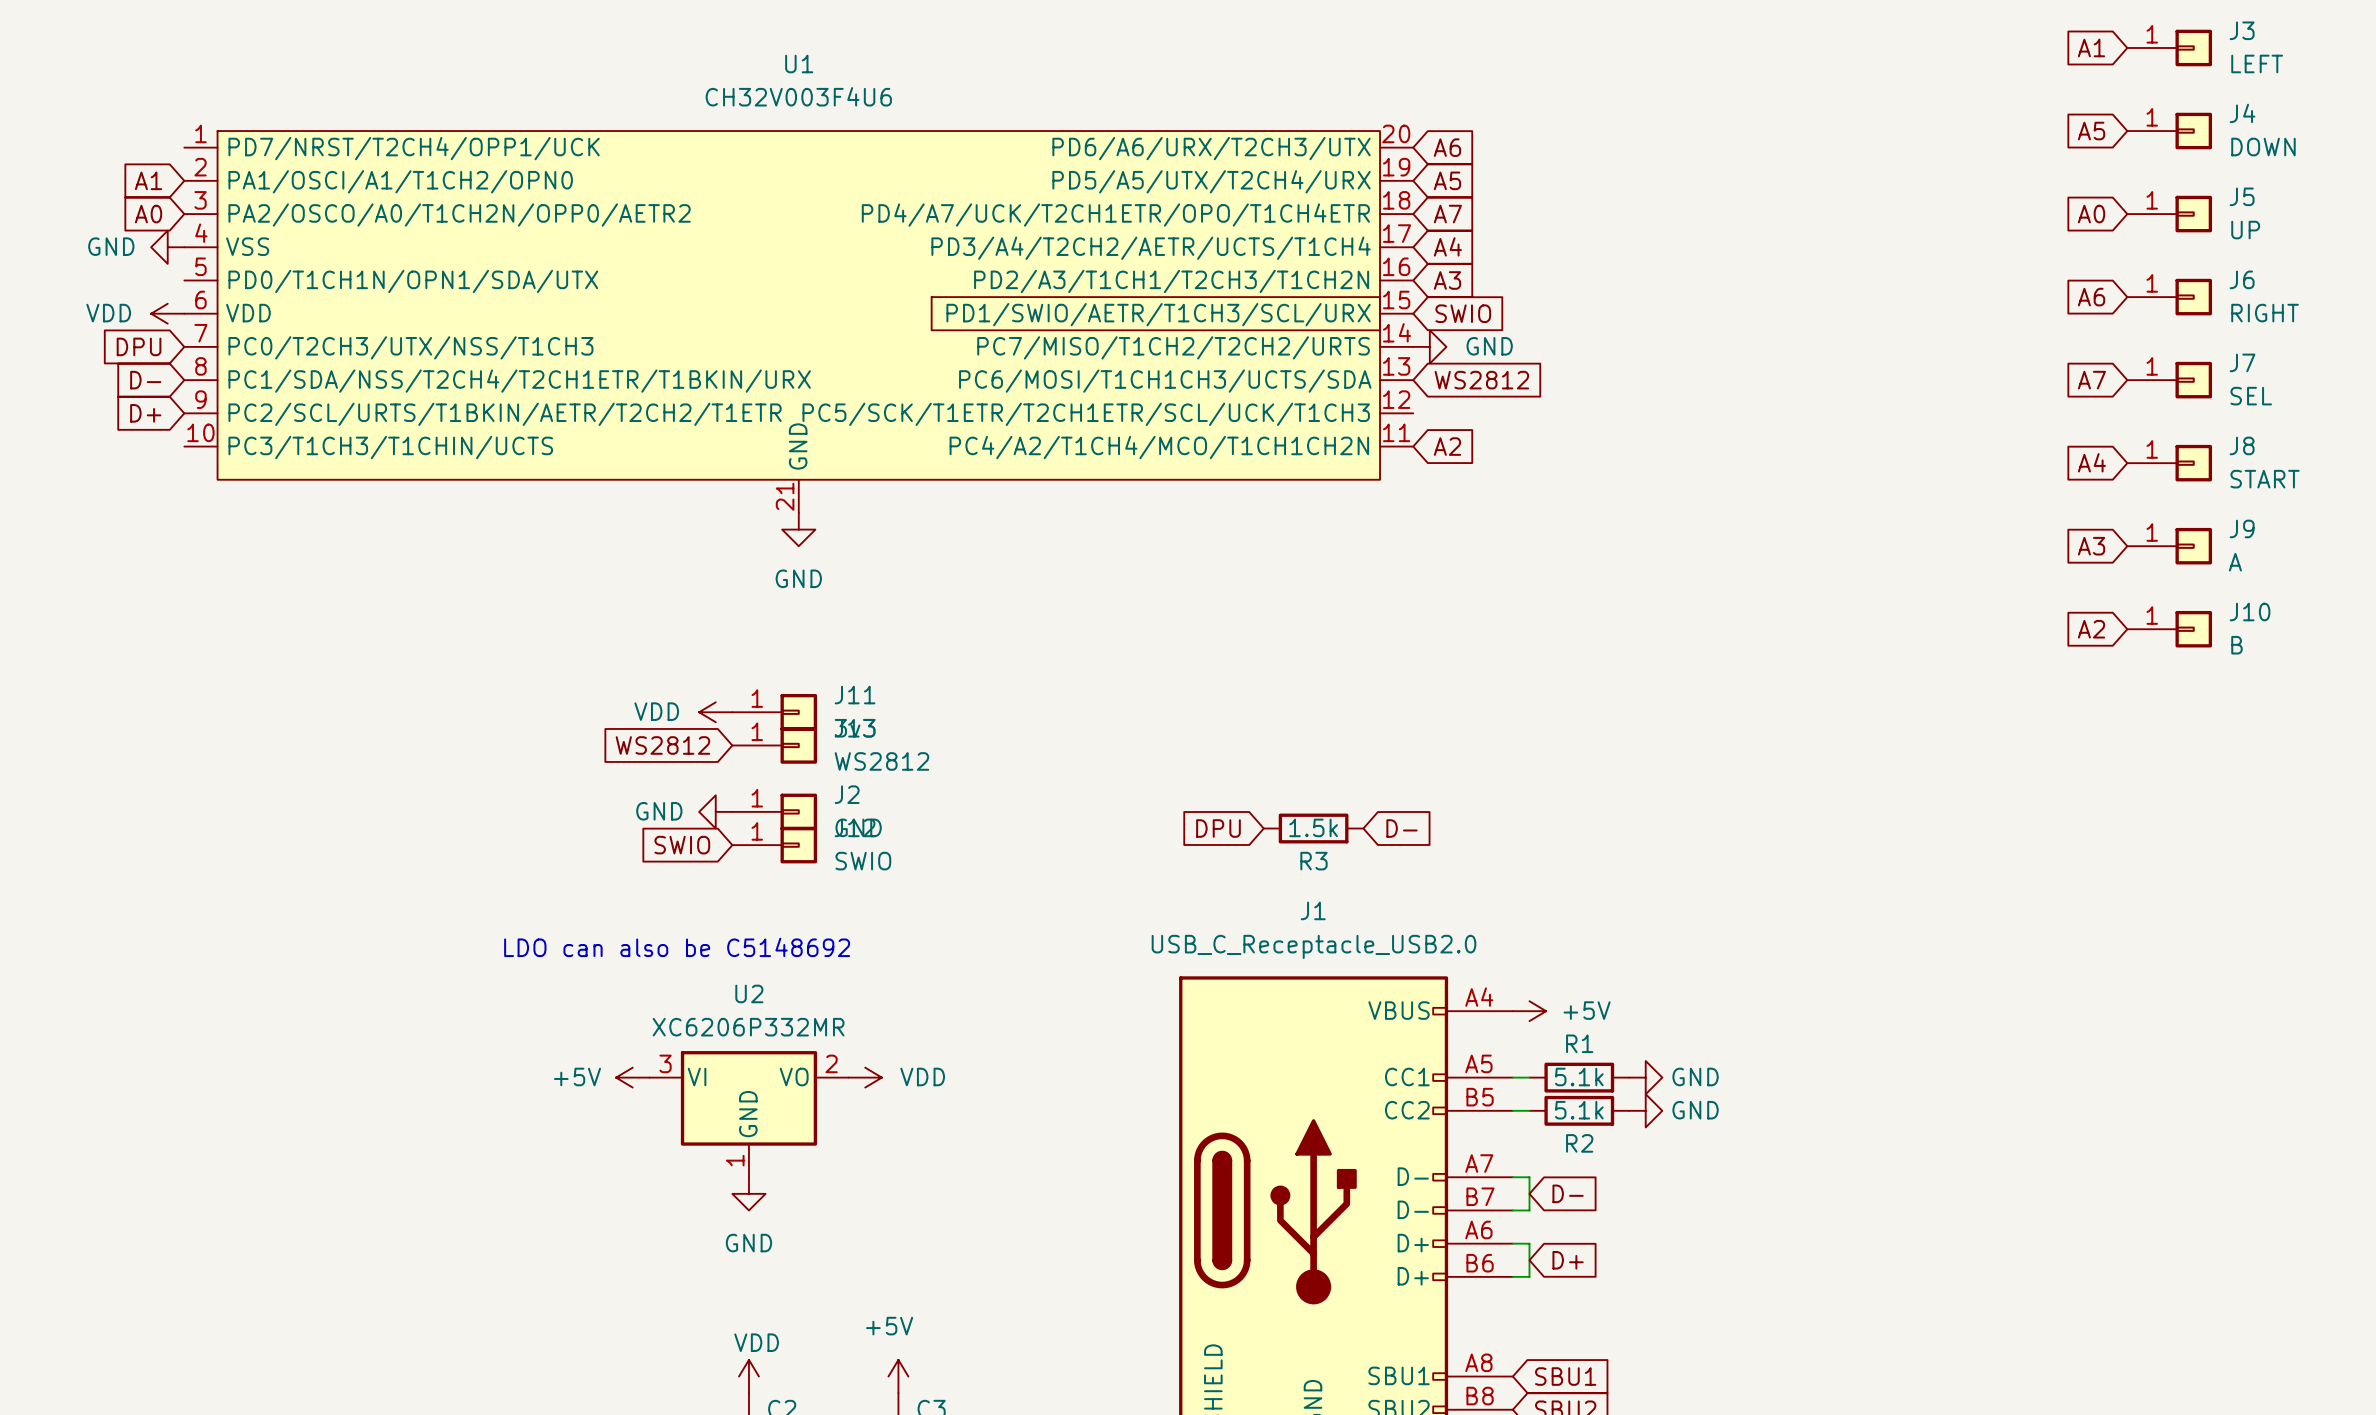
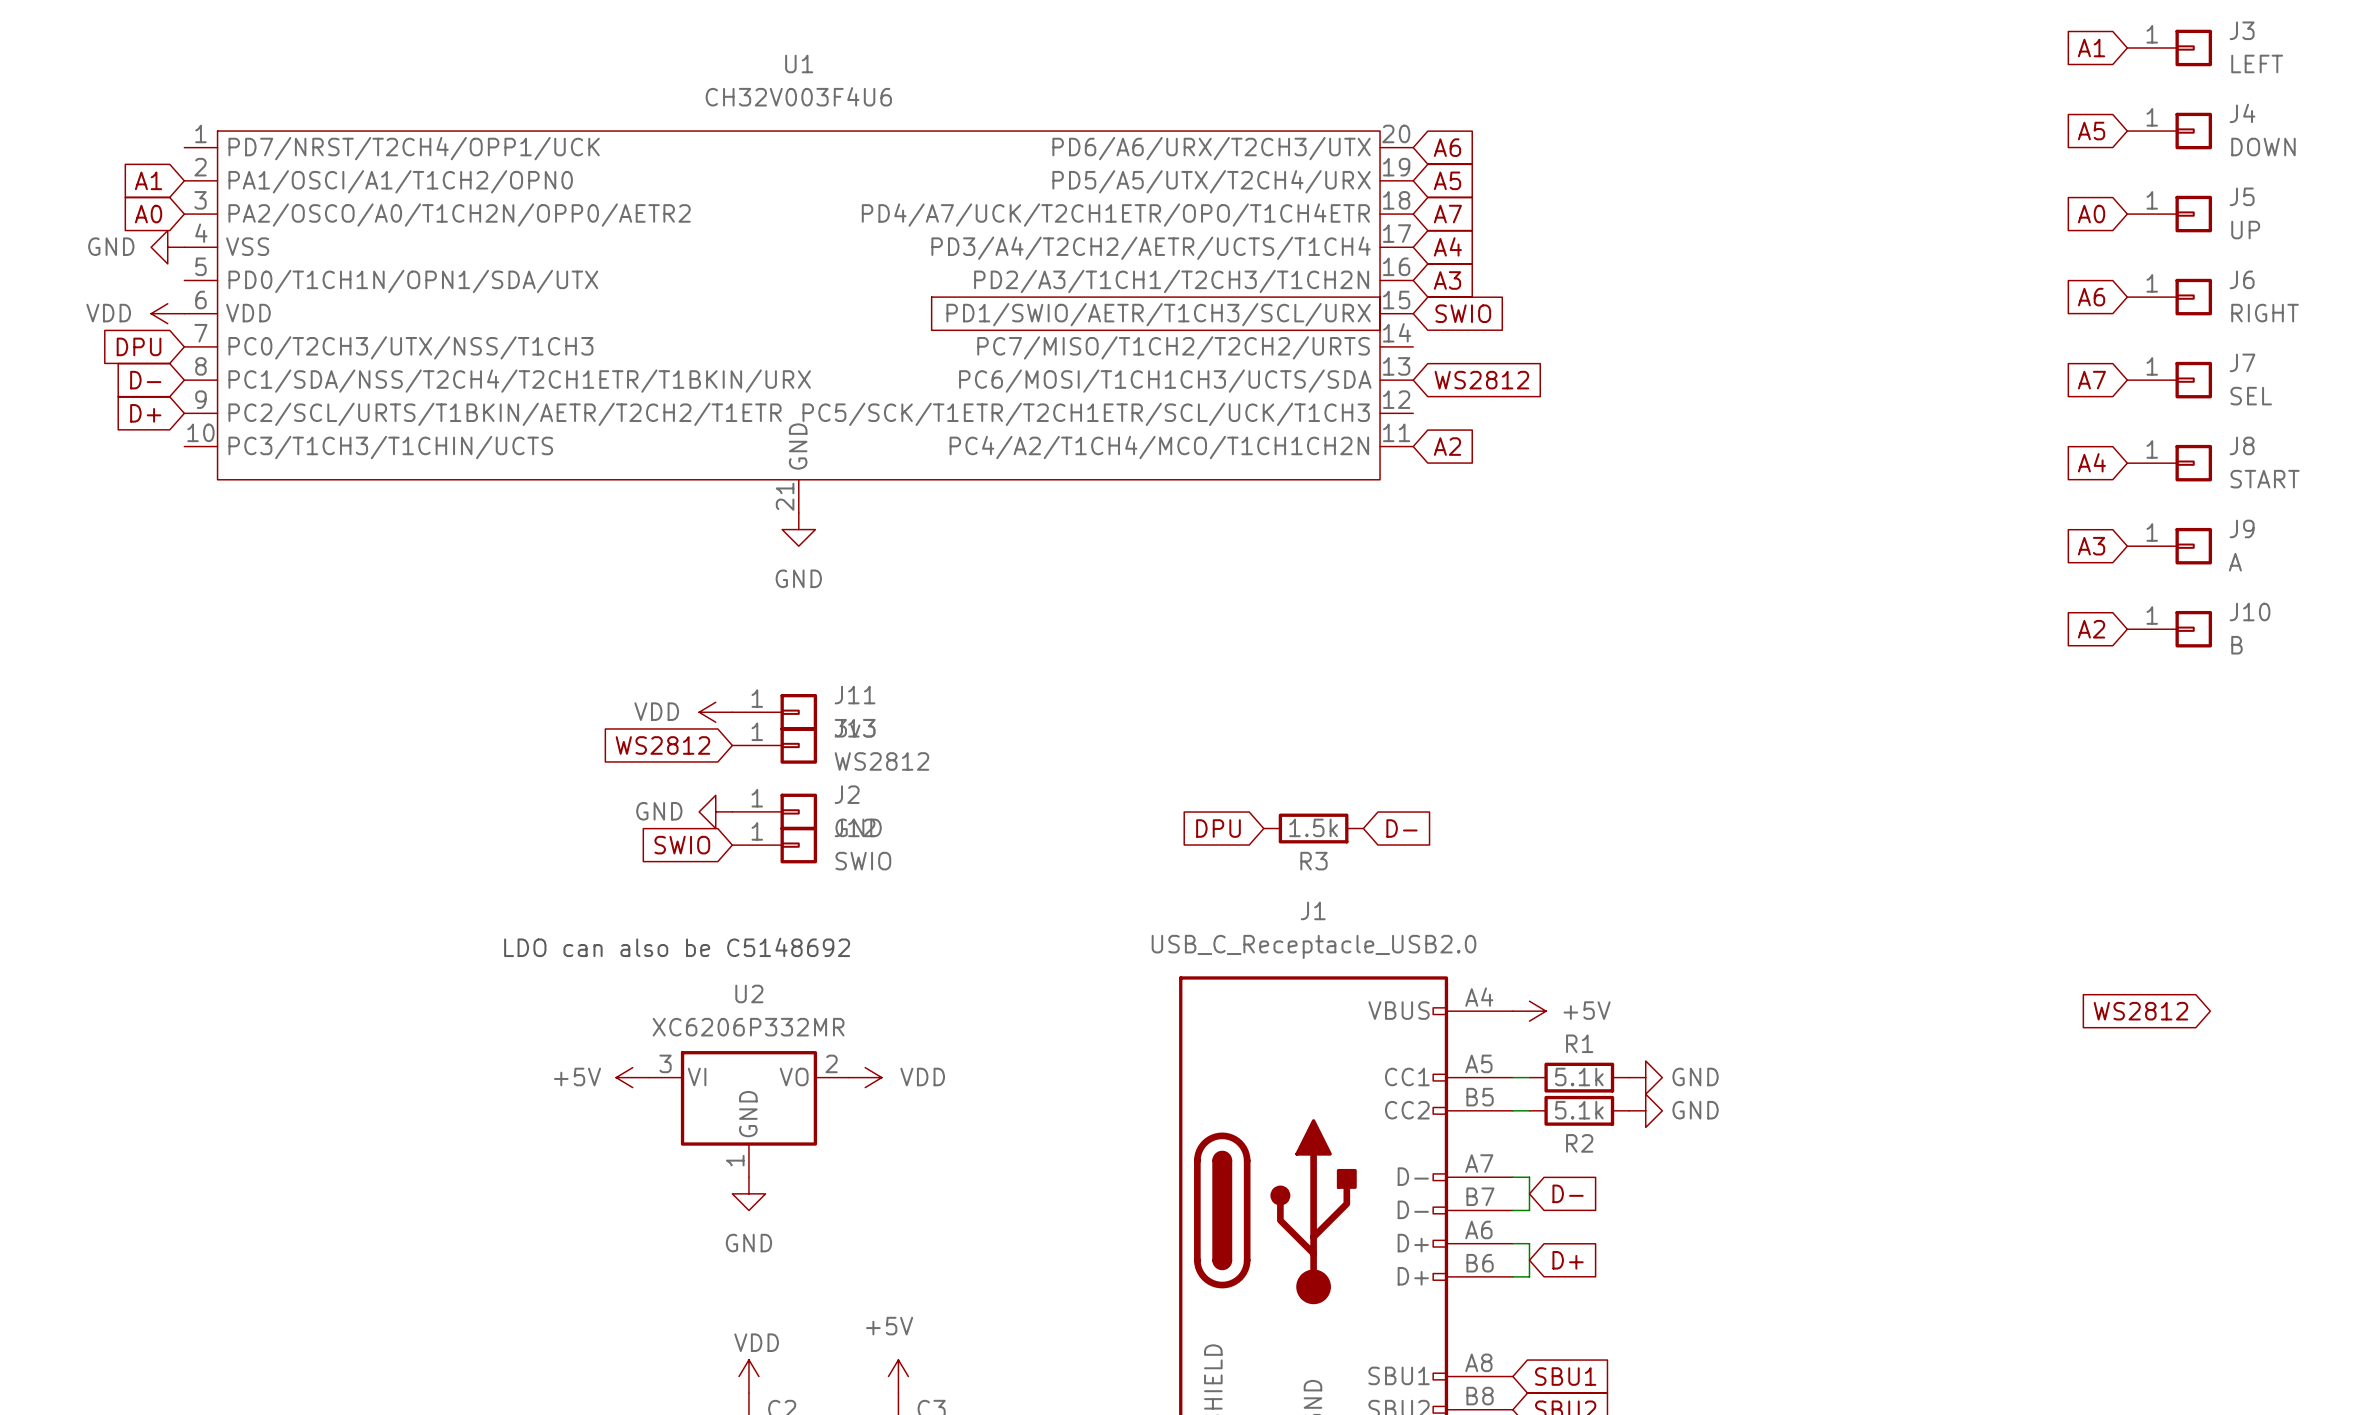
power symbol: GND (1429, 346) -> none
global label: none -> WS2812 (2140, 1011)

